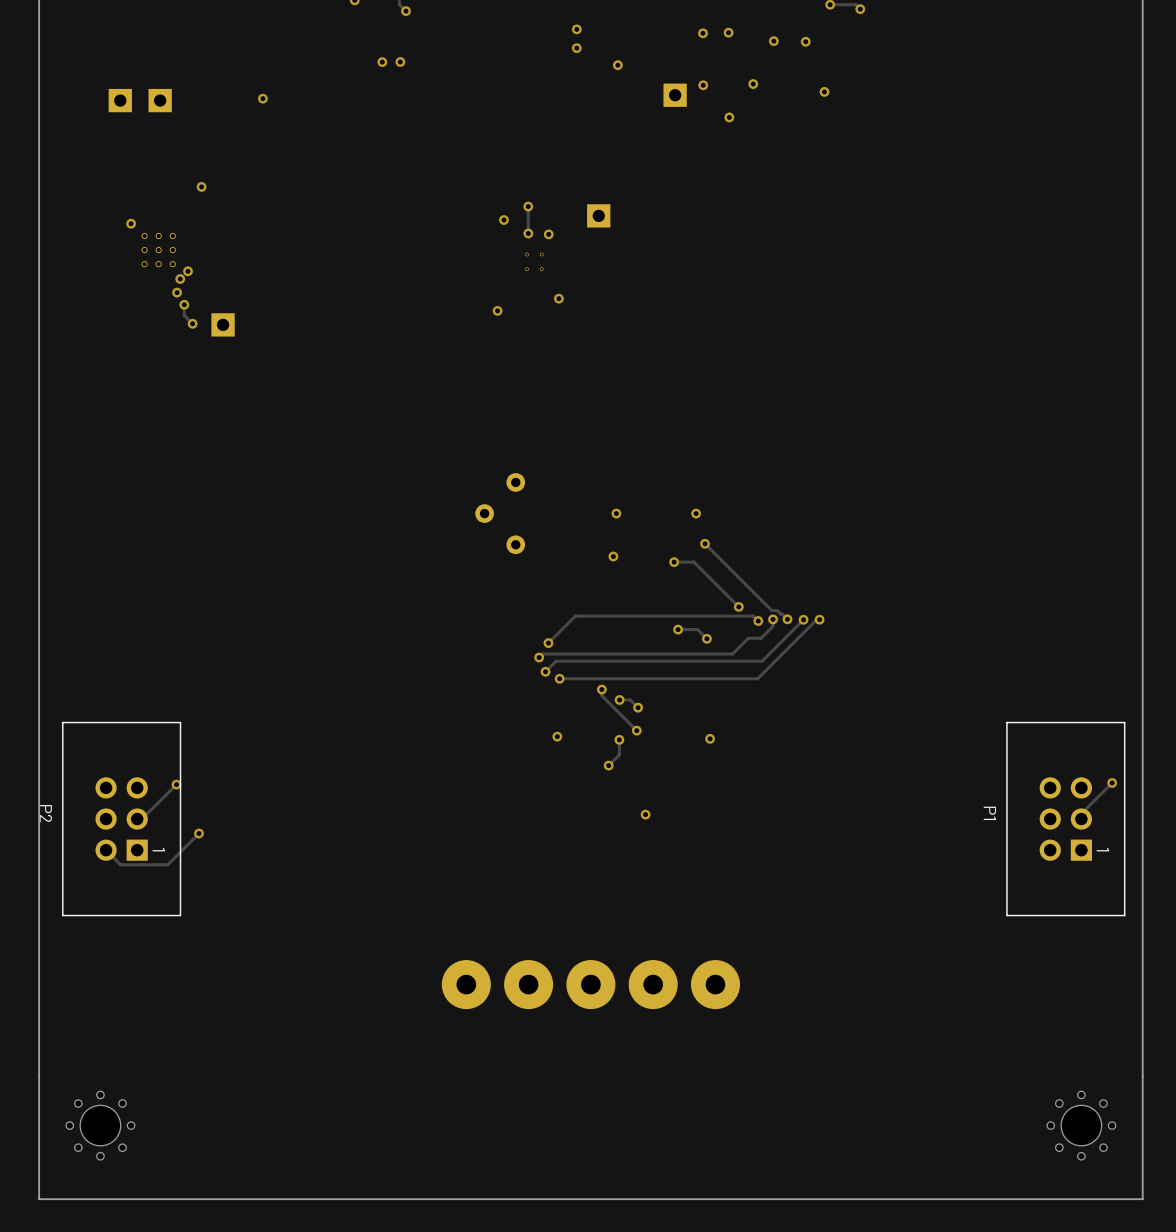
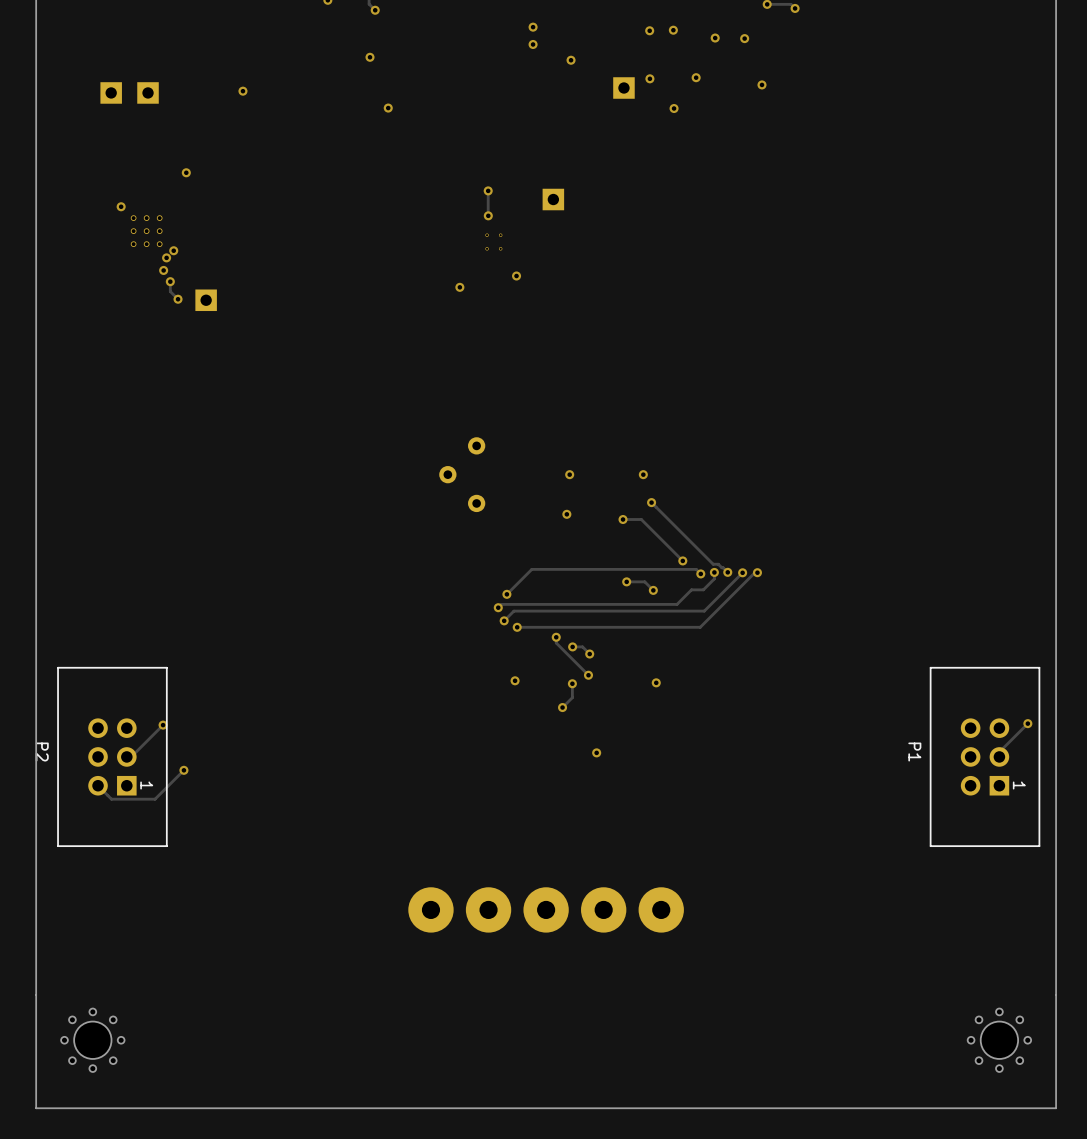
via: (382, 62) -> none
via: none -> (388, 108)
via: (503, 220) -> none
via: (548, 234) -> none

